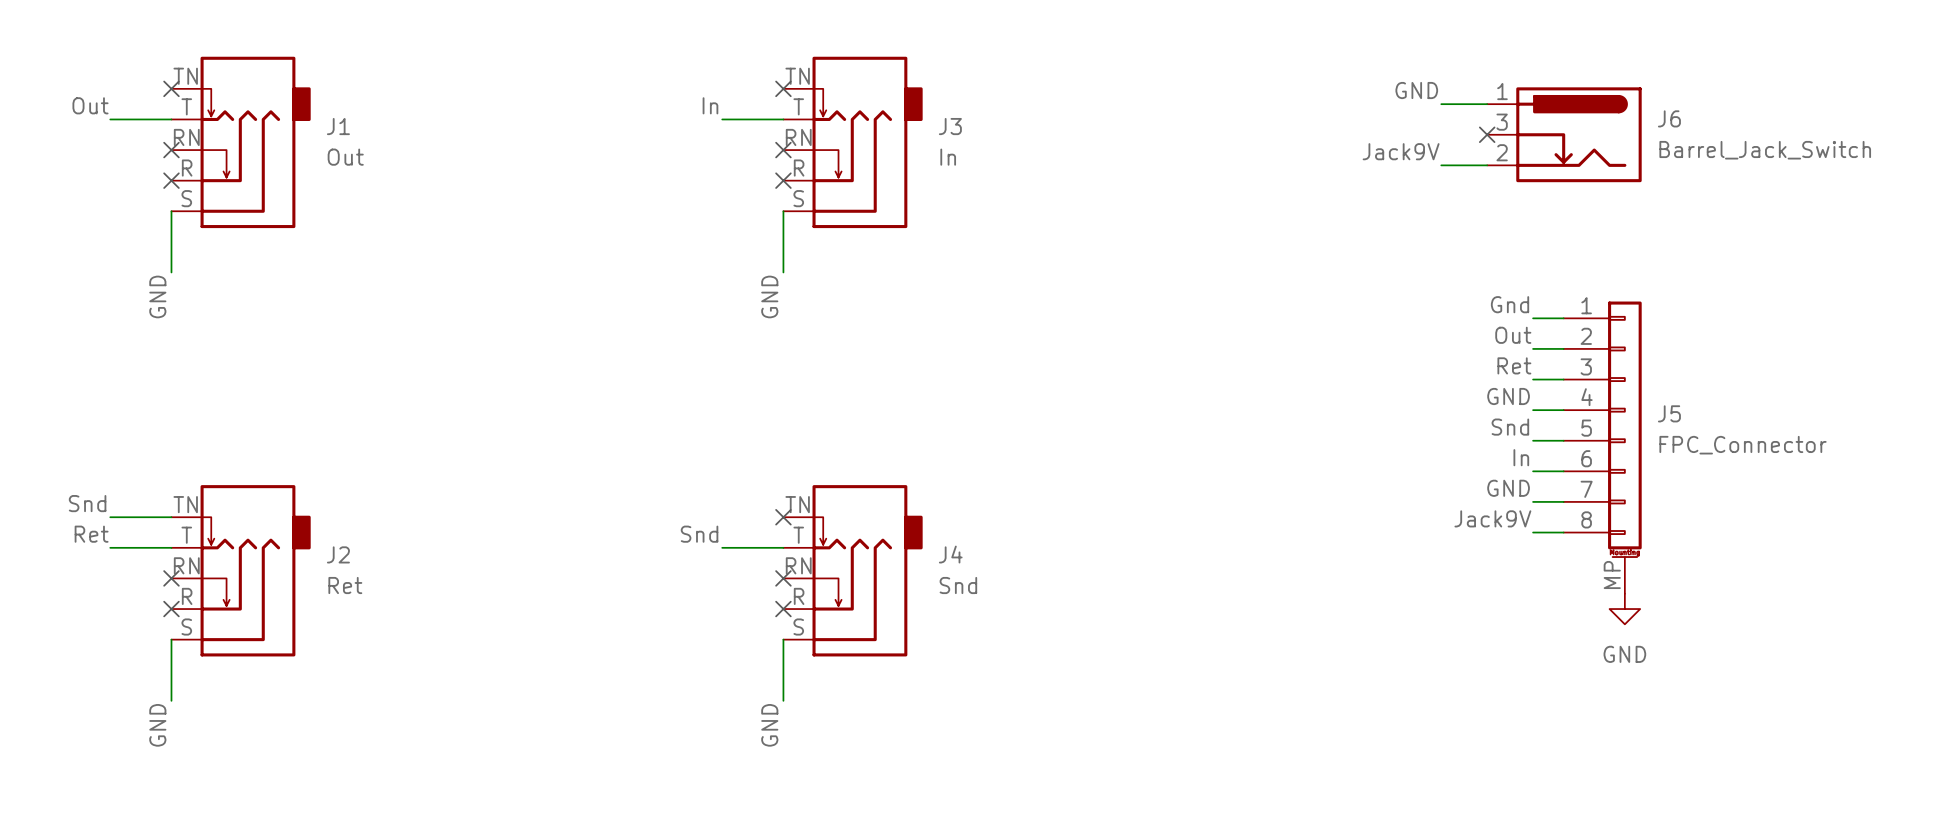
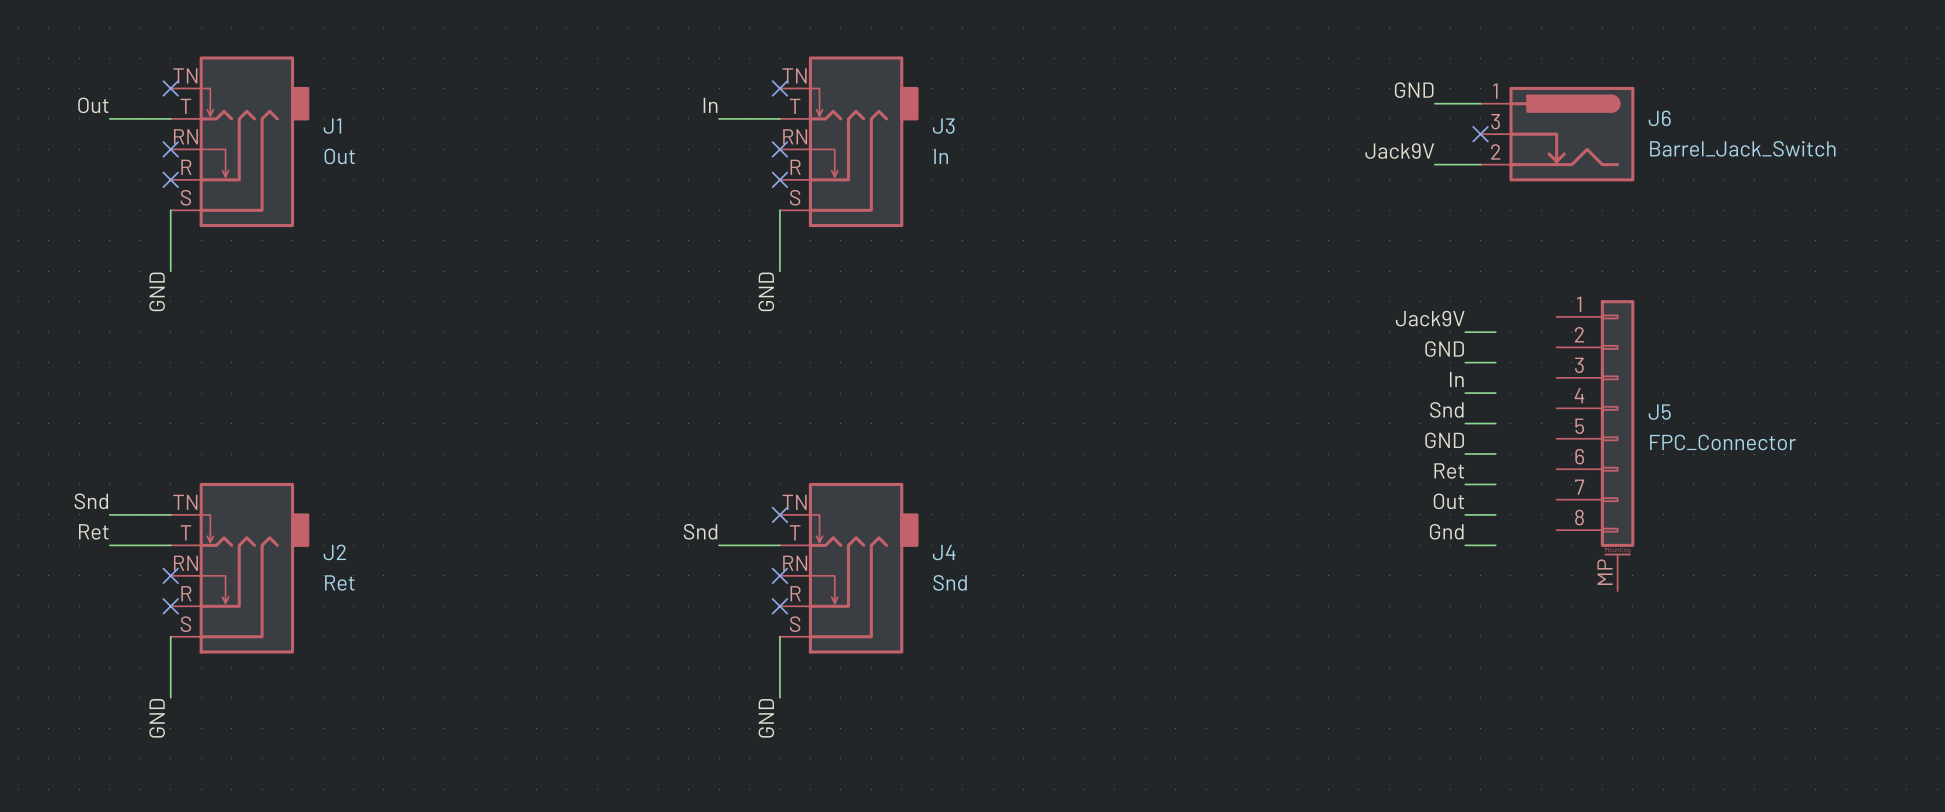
label position: Gnd (1510, 304) -> Gnd (1446, 531)
wire: (1533, 318) (1563, 318) -> (1465, 332) (1495, 332)
label position: Out (1513, 335) -> Out (1448, 501)
wire: (1533, 348) (1563, 348) -> (1465, 362) (1495, 362)
label: none -> GND (1444, 349)
label position: Ret (1514, 365) -> Ret (1449, 470)
wire: (1533, 379) (1563, 379) -> (1465, 393) (1495, 393)
label: GND (1508, 396) -> none
wire: (1533, 410) (1563, 410) -> (1465, 423) (1495, 423)
label position: Snd (1510, 427) -> Snd (1446, 409)
wire: (1533, 440) (1563, 440) -> (1465, 454) (1495, 454)
label: none -> GND (1444, 440)
label position: In (1521, 457) -> In (1456, 379)
wire: (1533, 471) (1563, 471) -> (1465, 484) (1495, 484)
label: GND (1508, 488) -> none
wire: (1533, 501) (1563, 501) -> (1465, 514) (1495, 514)
label position: Jack9V (1492, 518) -> Jack9V (1430, 318)
wire: (1533, 532) (1563, 532) -> (1465, 545) (1495, 545)
power symbol: GND (1624, 609) -> none

